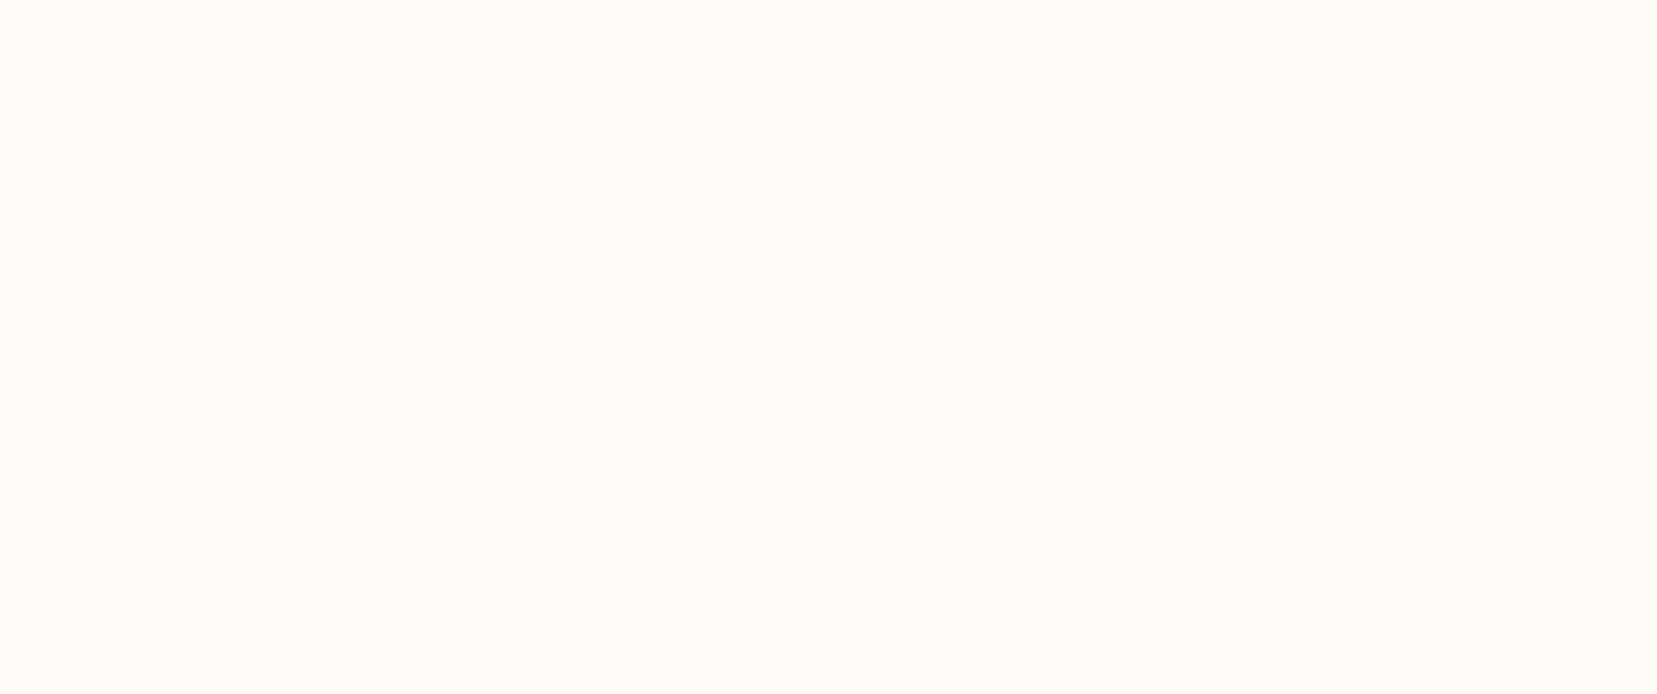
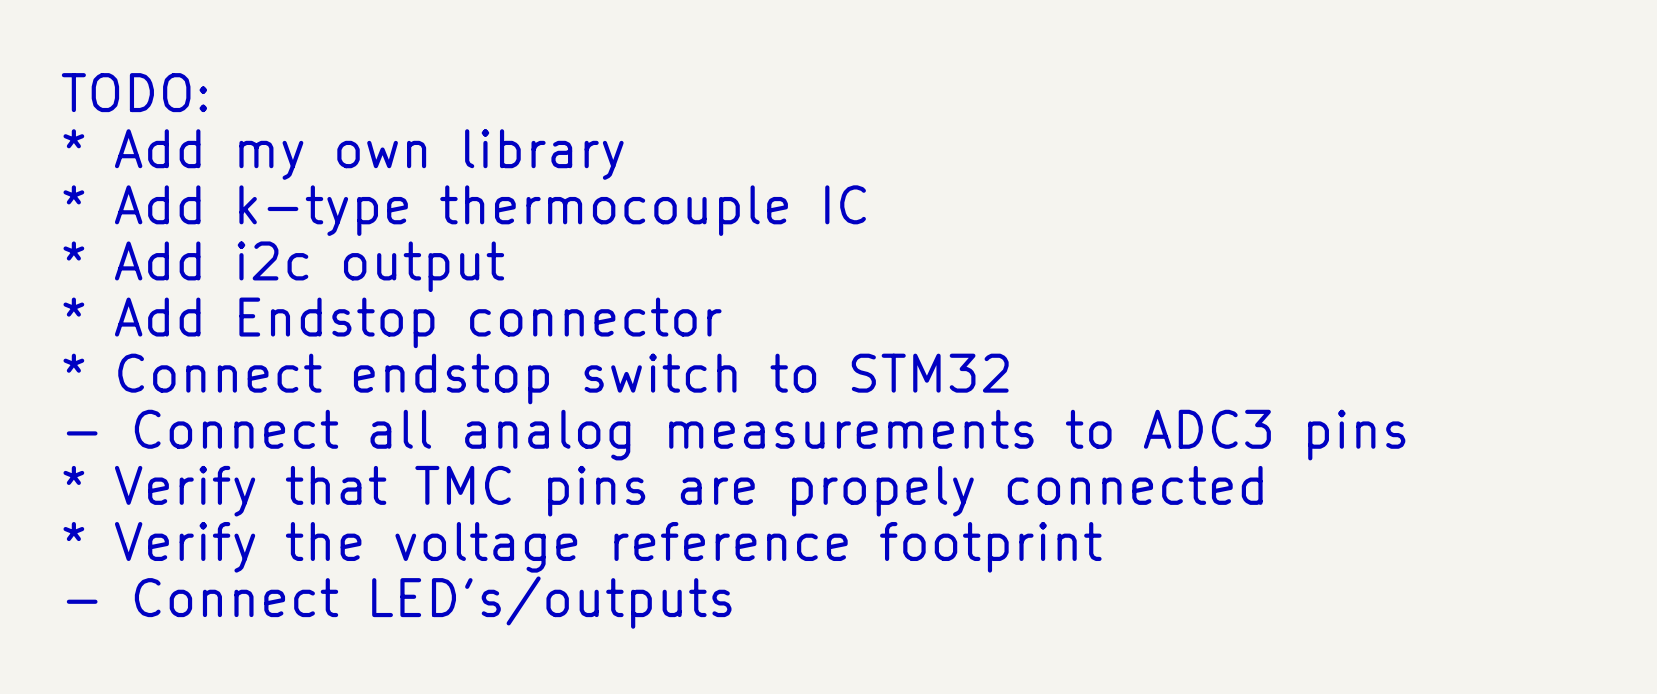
text: none -> TODO: (134, 92)
text: none -> * Add my own library (343, 154)
text: none -> * Add k-type thermocouple IC (464, 210)
text: none -> * Add i2c output (283, 266)
text: none -> * Add Endstop connector (392, 322)
text: none -> * Connect endstop switch to STM32 (536, 378)
text: none -> - Connect all analog measurements to ADC3 pins (736, 435)
text: none -> * Verify that TMC pins are propely connected (663, 491)
text: none -> * Verify the voltage reference footprint (582, 547)
text: none -> - Connect LED's/outputs (399, 602)

